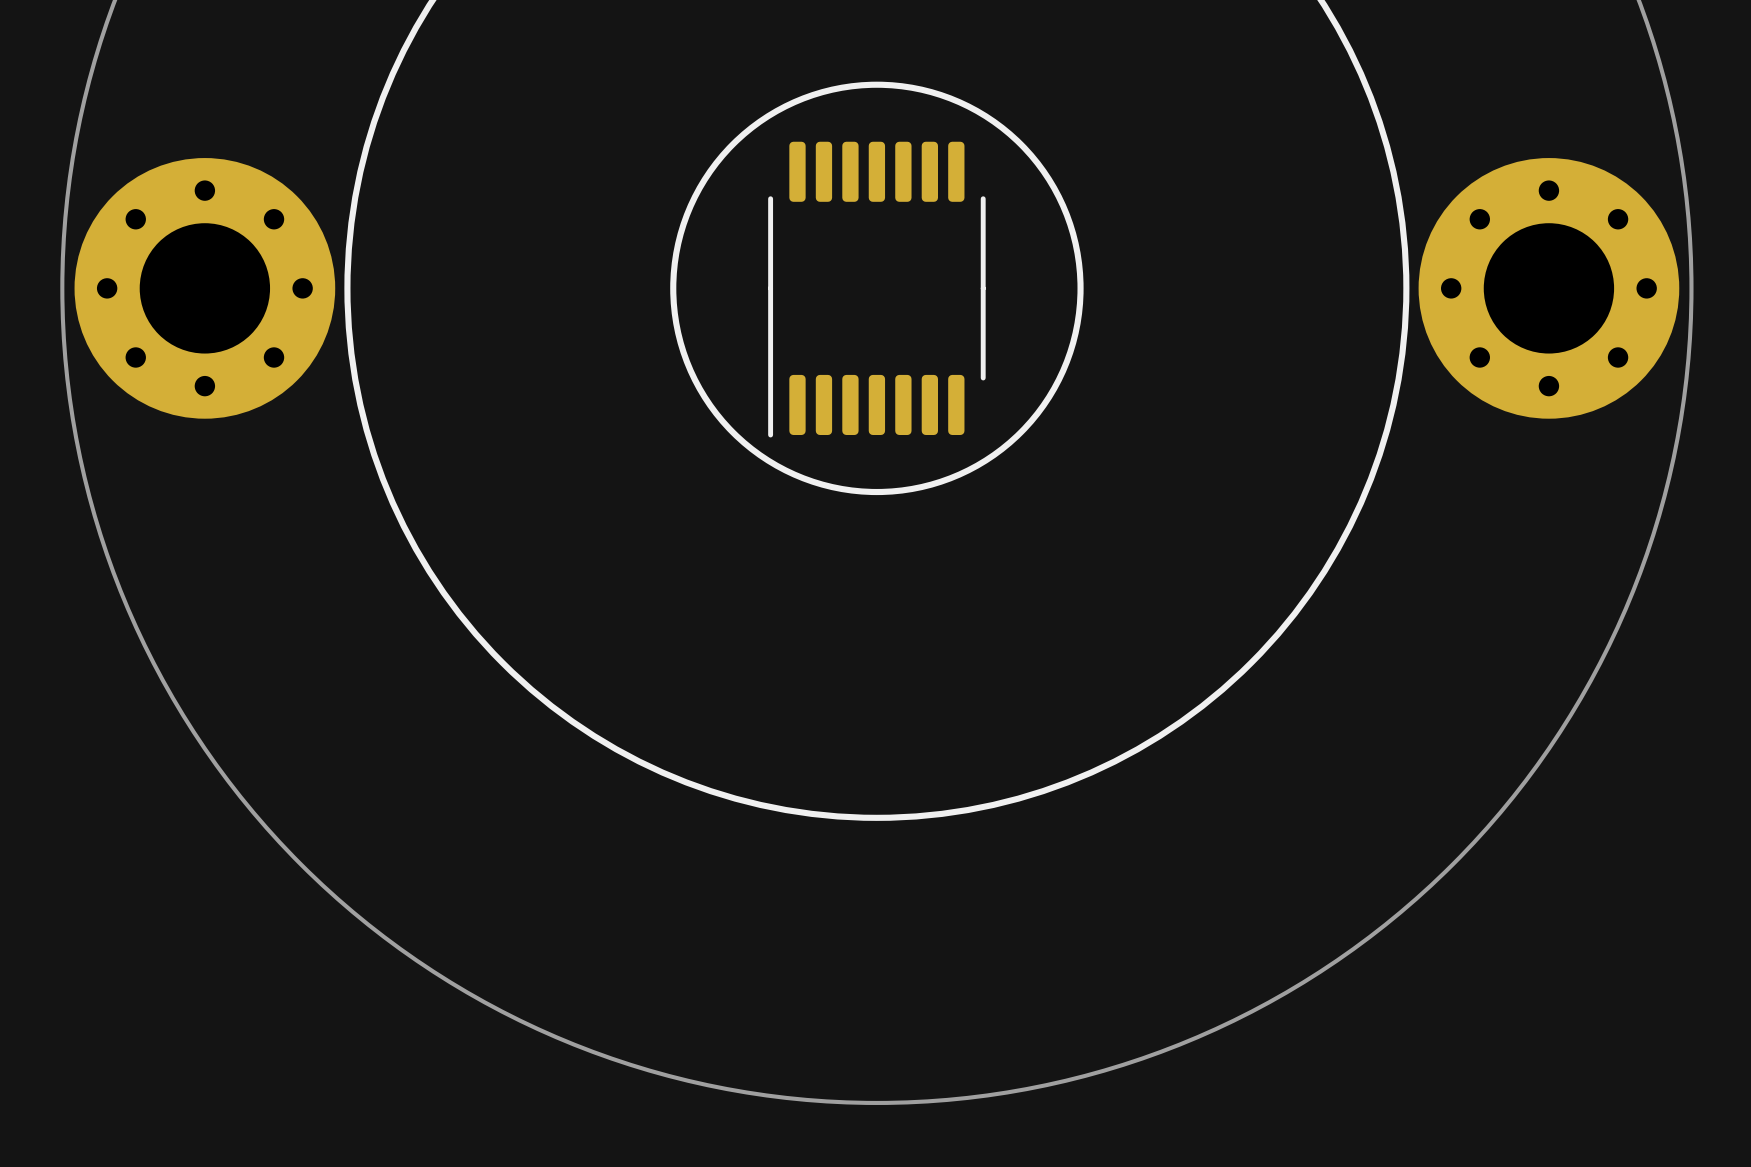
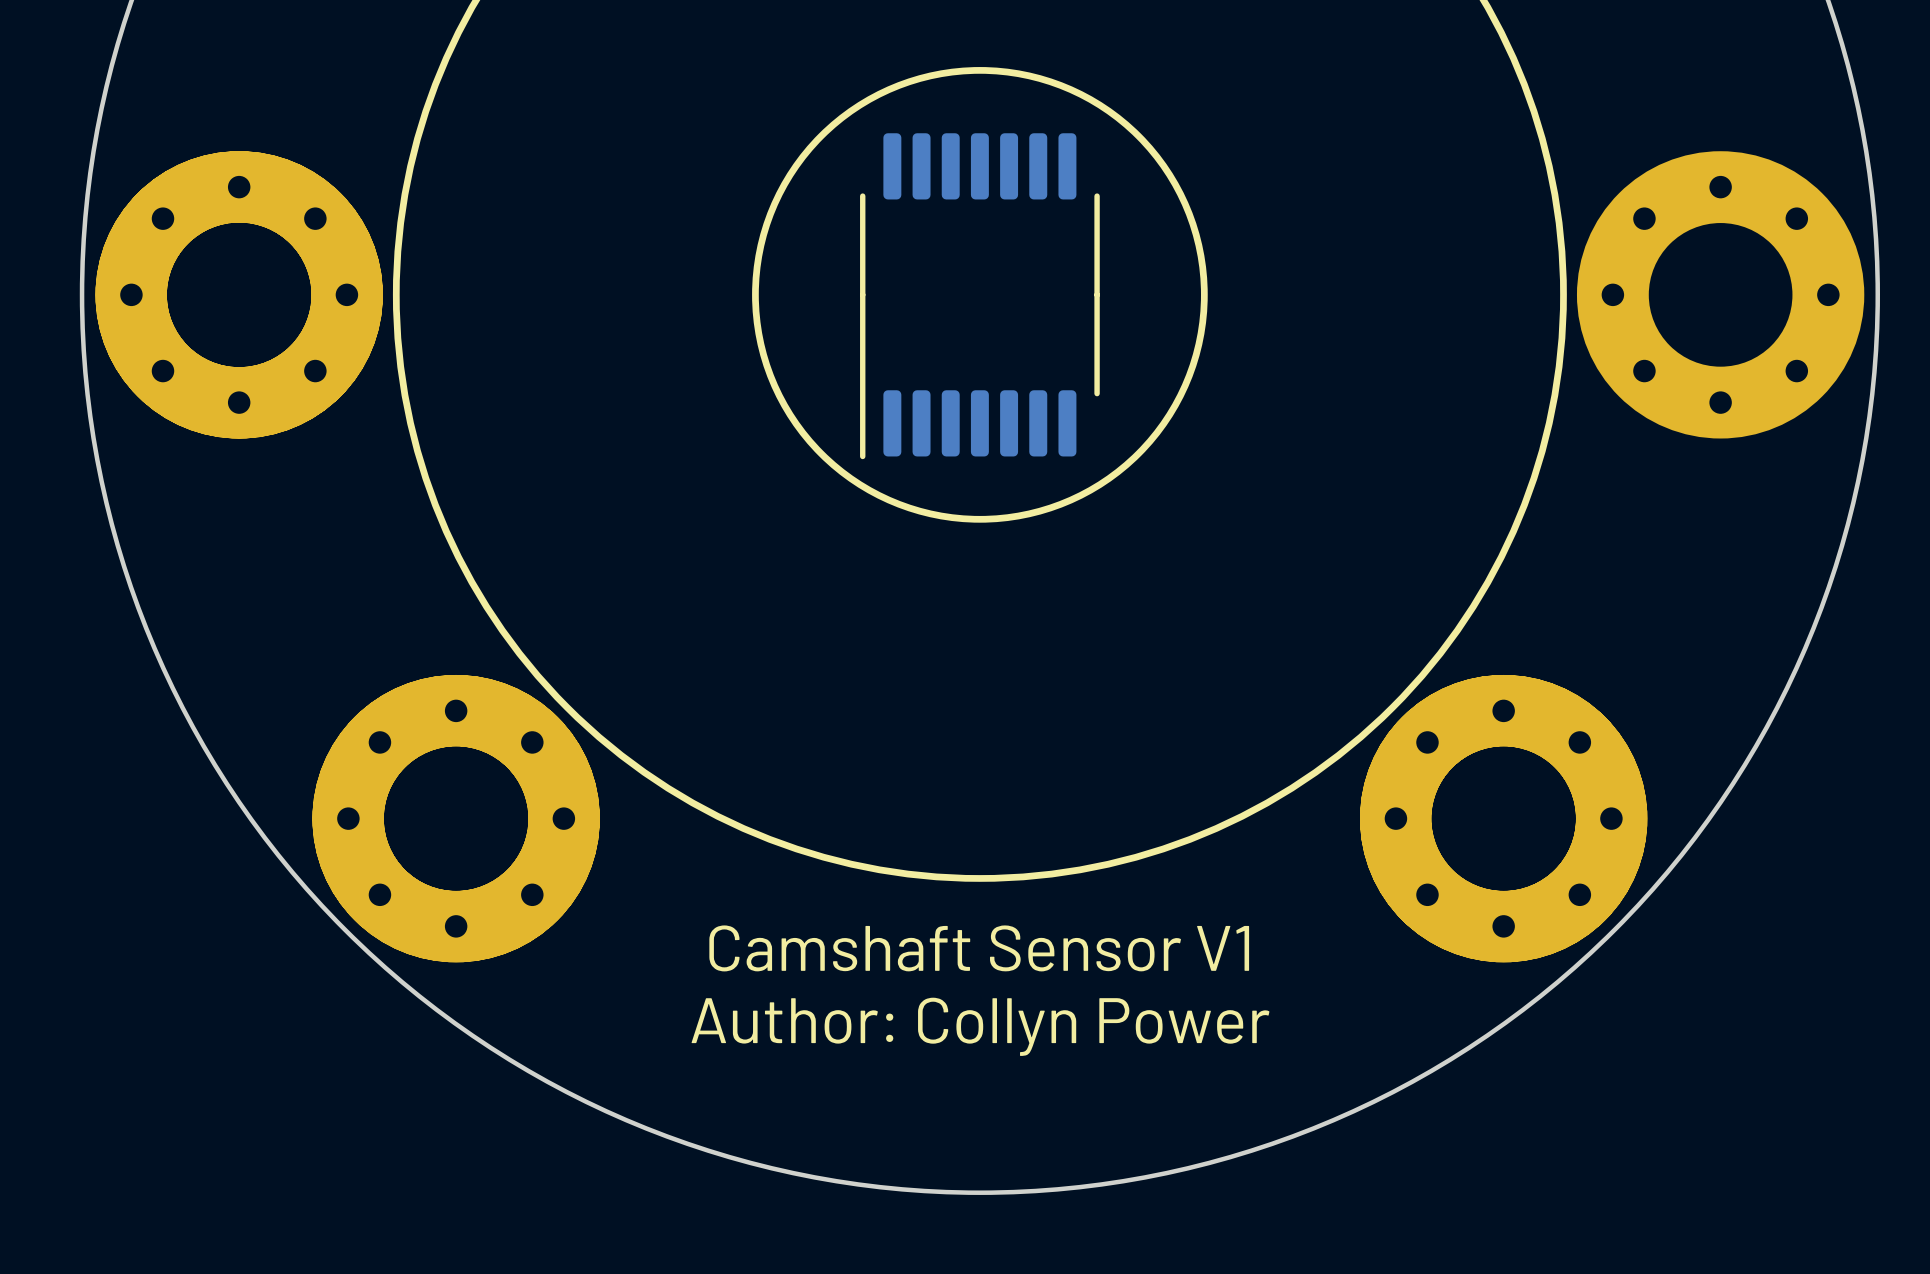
part: none -> (239, 294)
part: none -> (456, 818)
part: none -> (456, 818)
part: none -> (1503, 818)
part: none -> (1503, 818)
text: none -> Camshaft Sensor V1 (979, 948)
text: none -> Author: Collyn Power (980, 1026)

